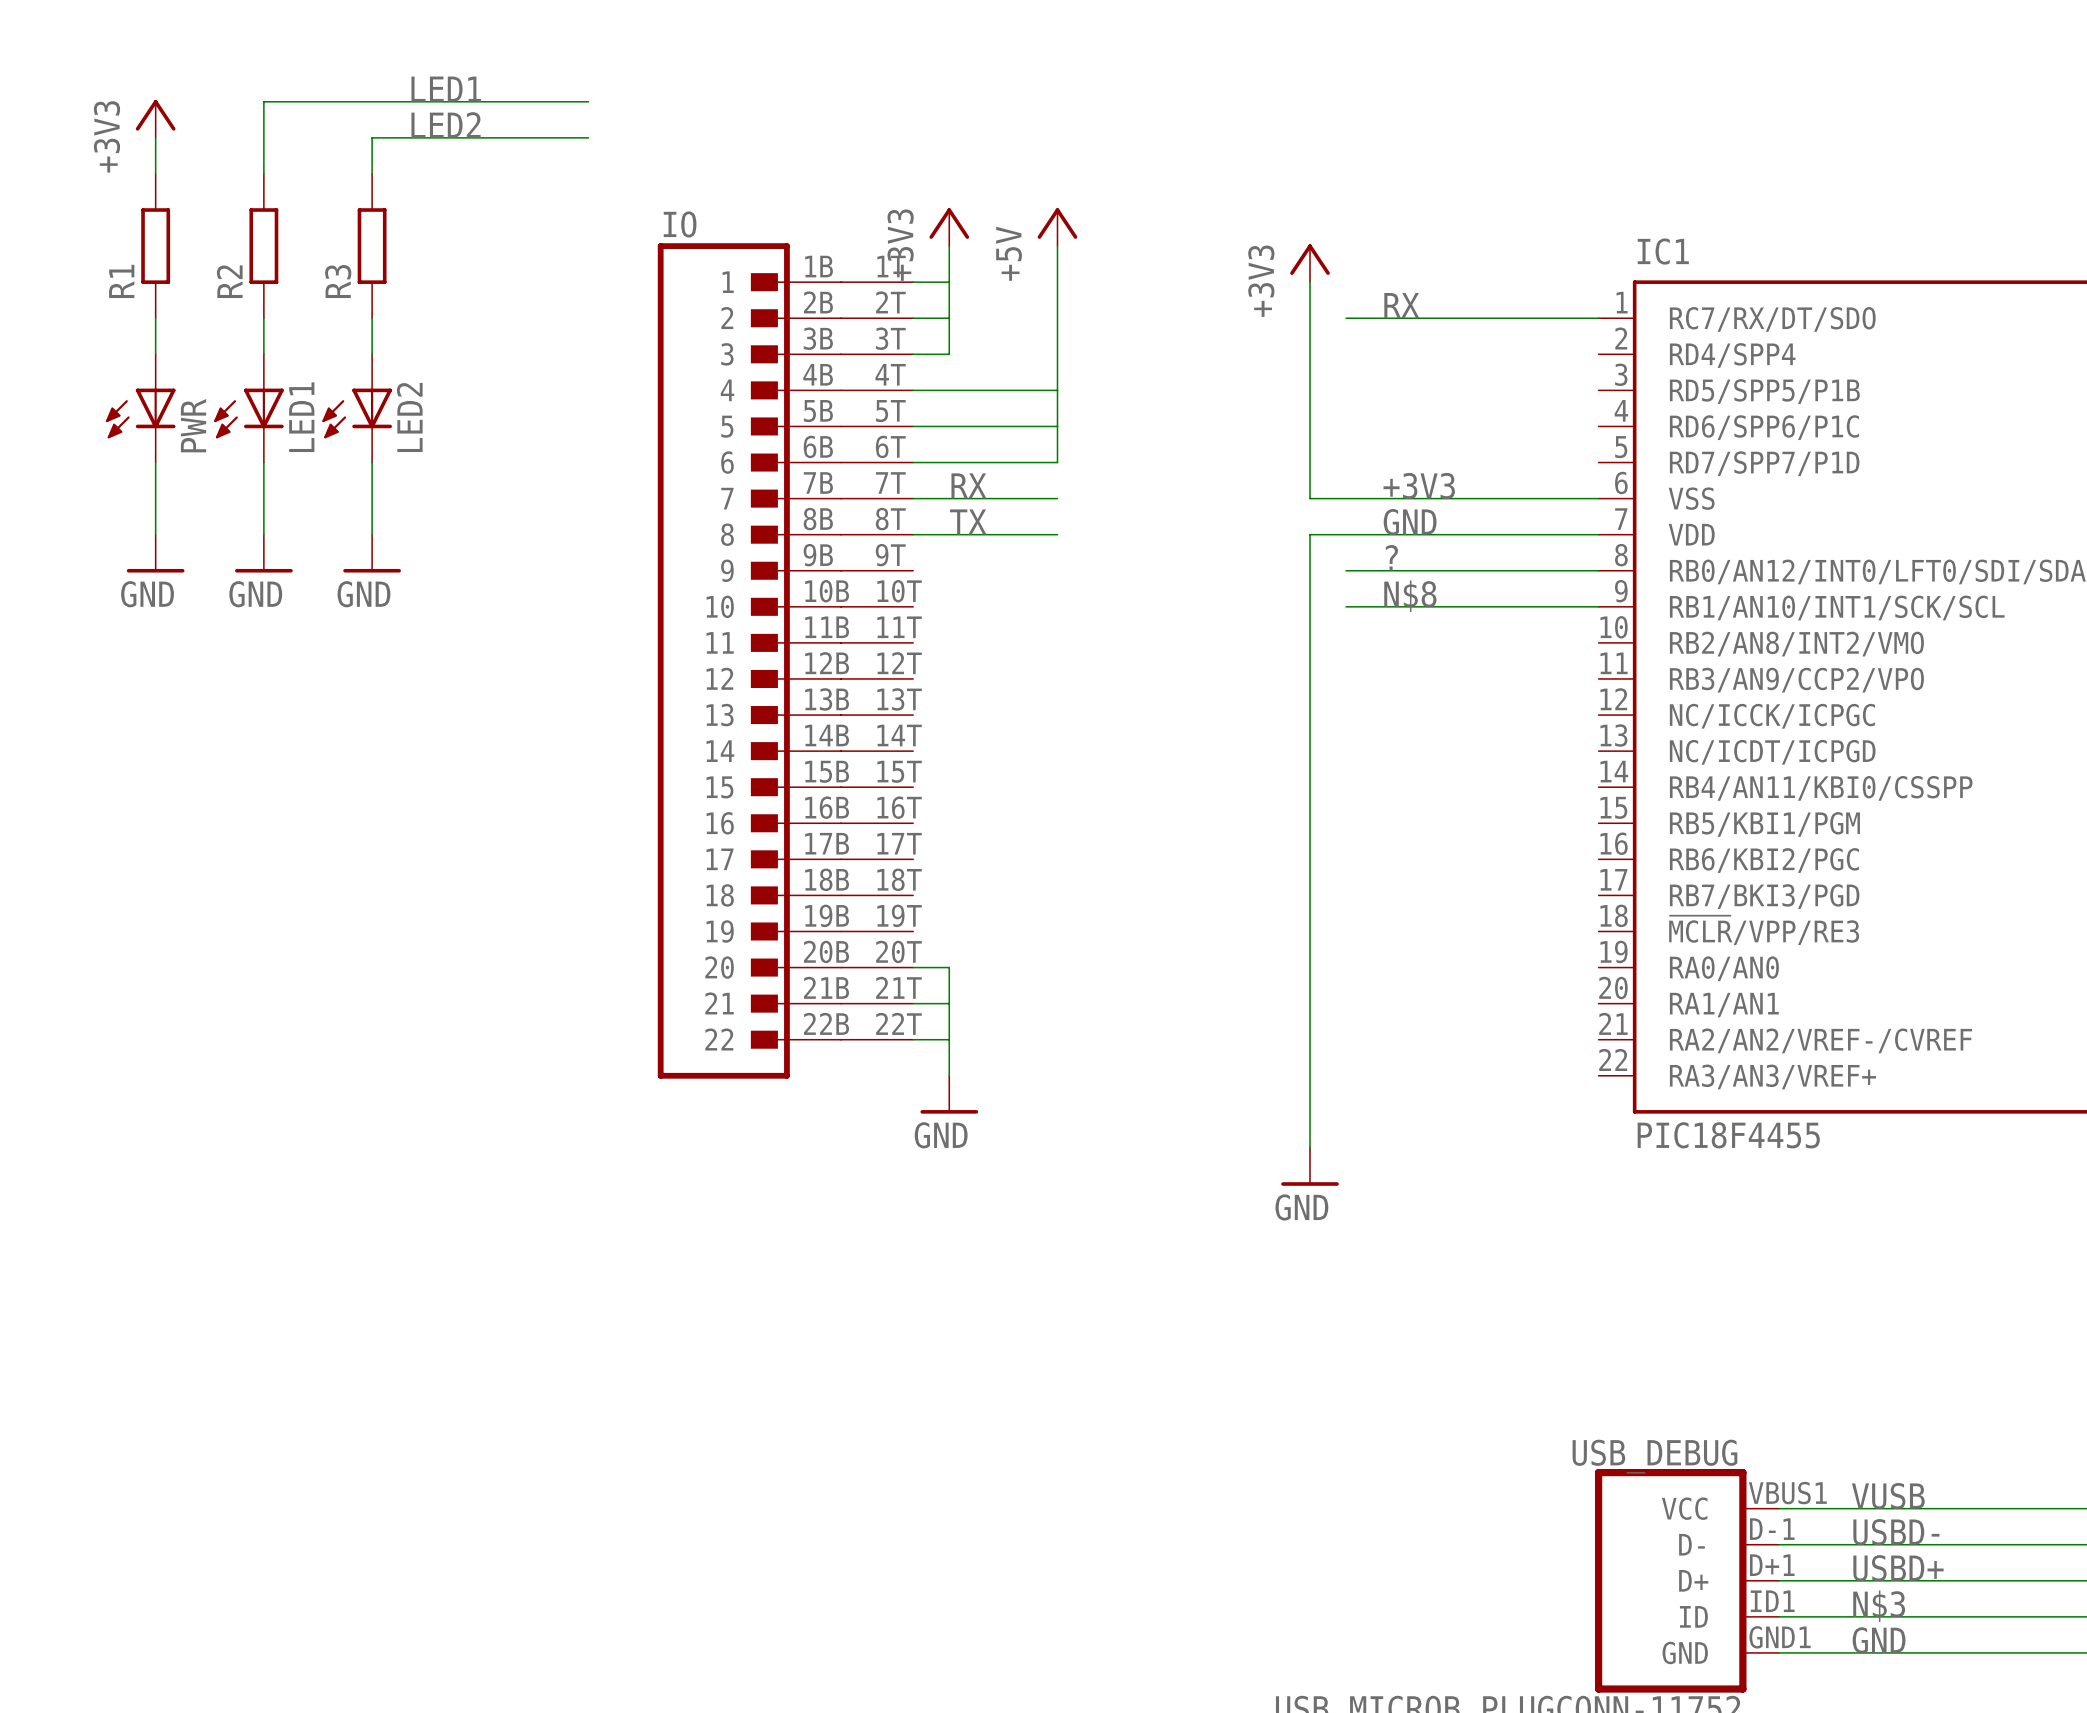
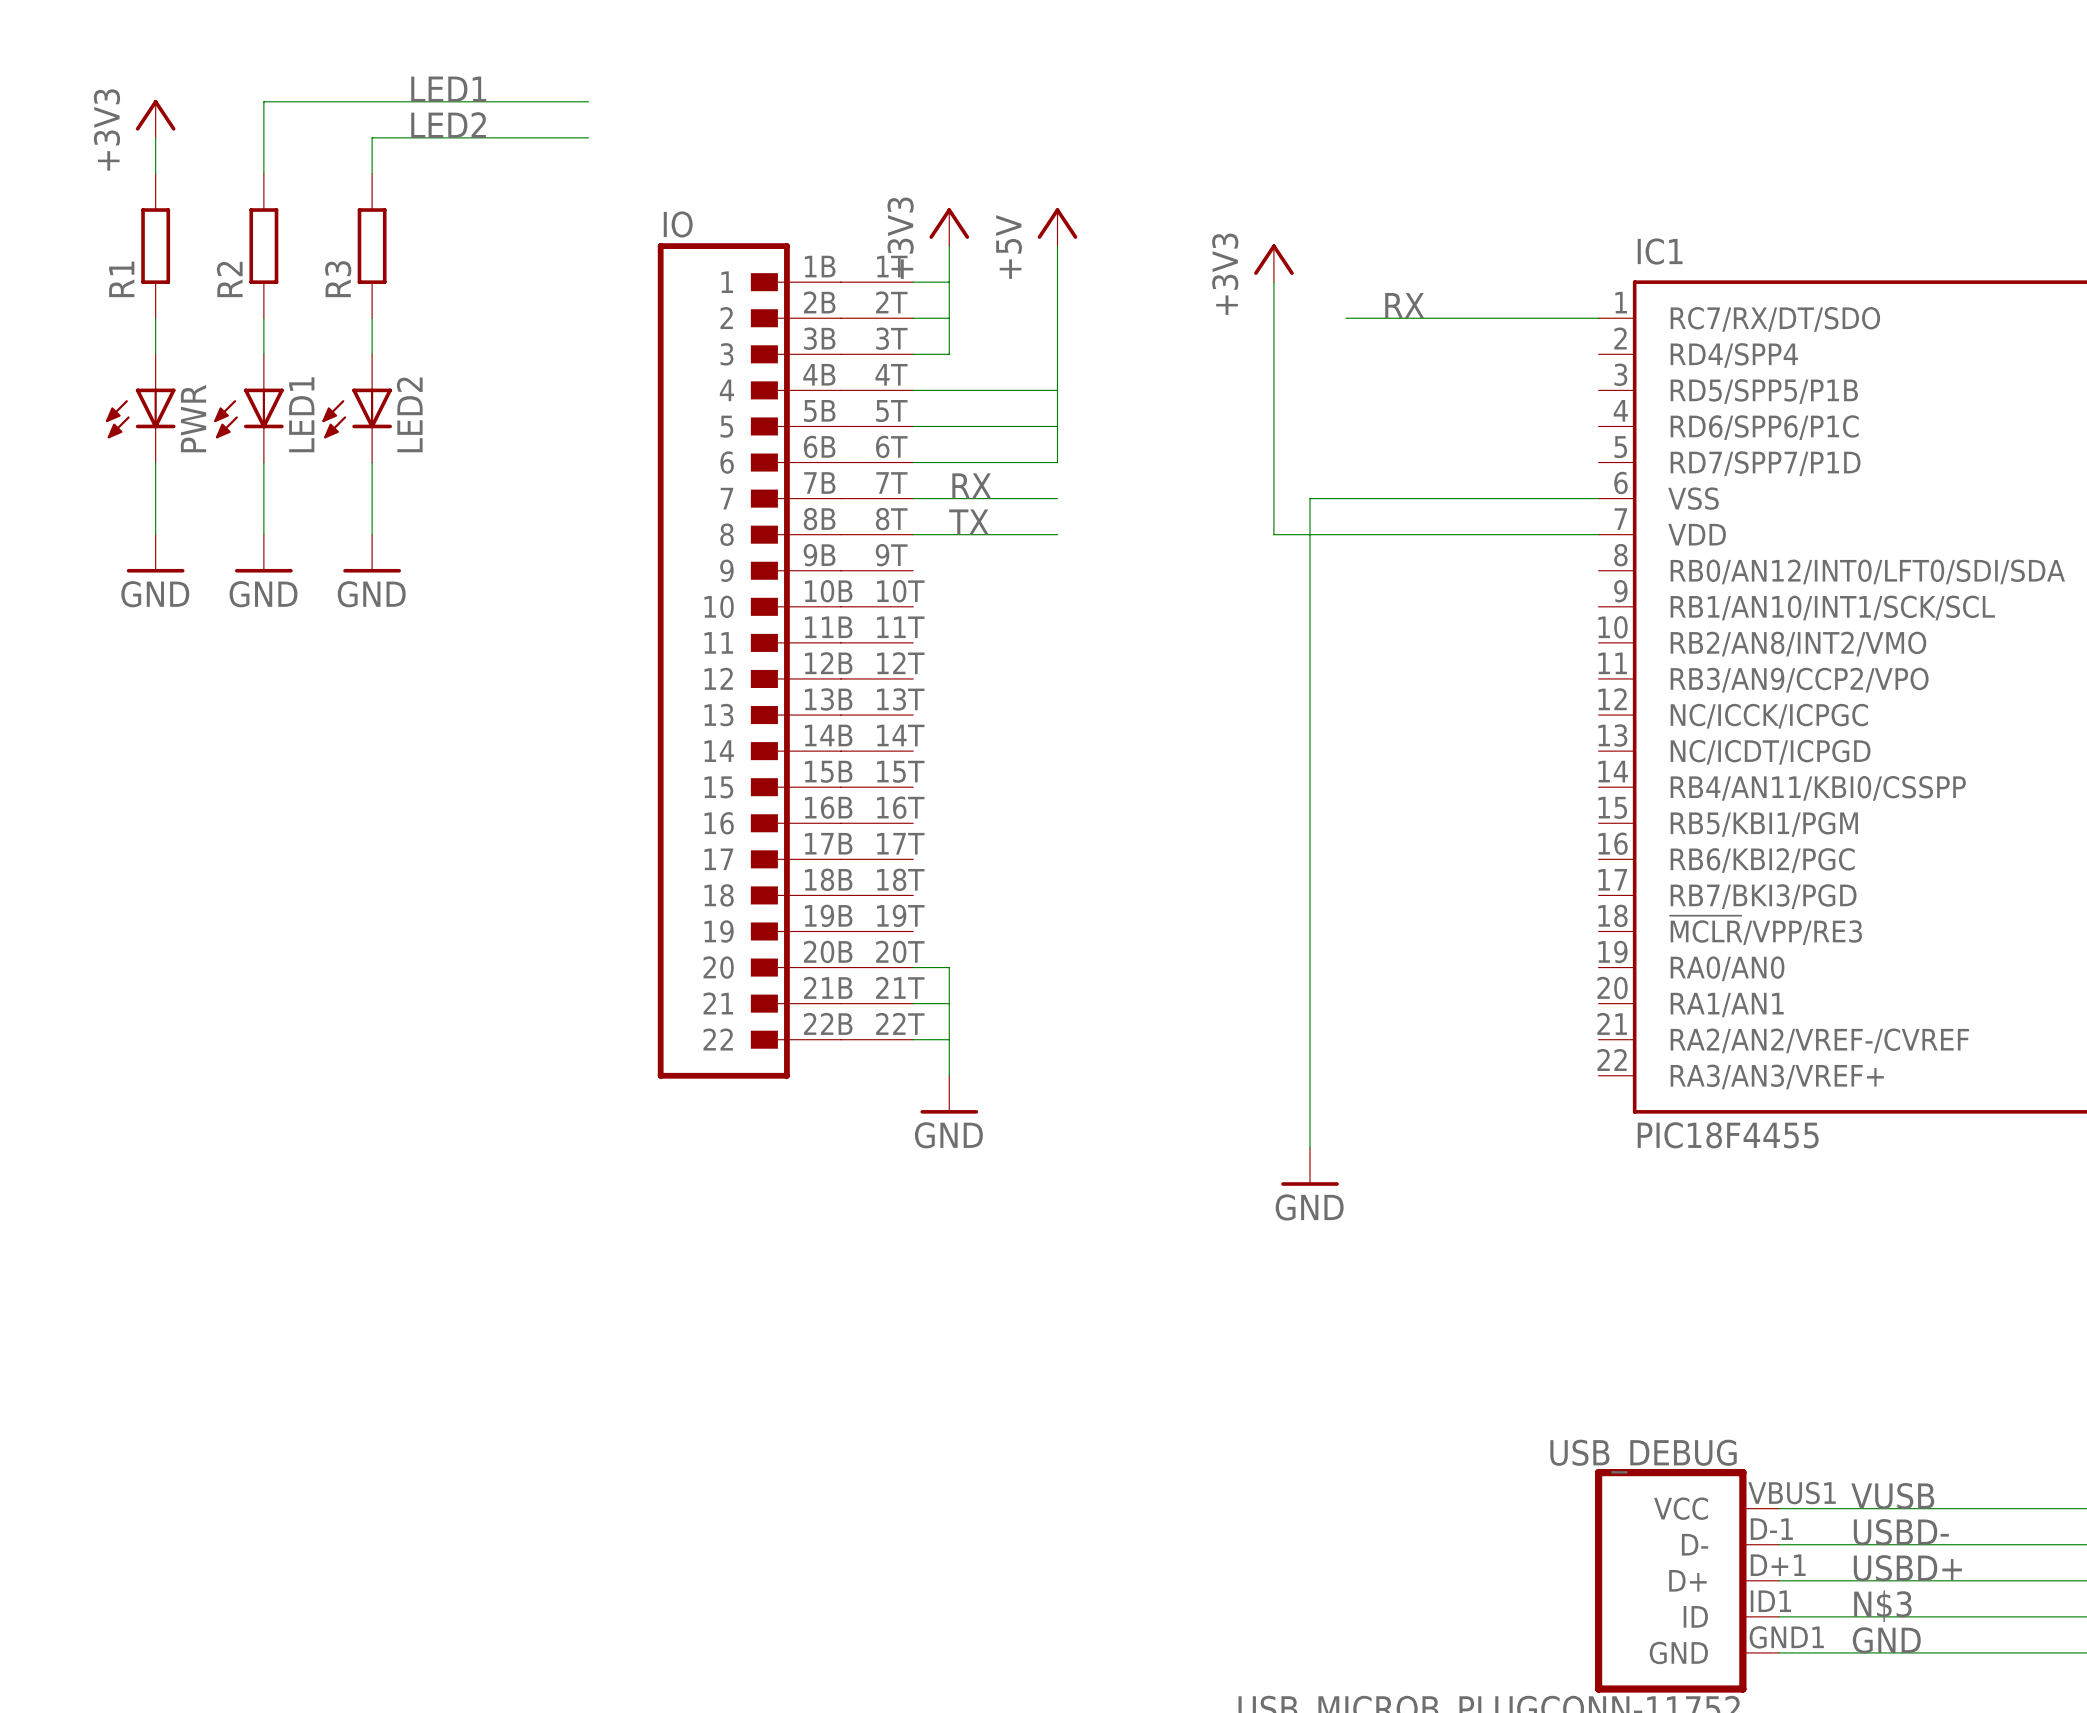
power symbol position: +3V3 (1310, 263) -> +3V3 (1273, 263)
wire: (1310, 282) (1310, 498) -> (1273, 282) (1273, 534) (1310, 534) (1310, 498)
label: +3V3 (1419, 486) -> none
label: GND (1410, 522) -> none
label: ? (1391, 557) -> none
wire: (1346, 570) (1598, 570) -> none
label: N$8 (1410, 596) -> none
wire: (1346, 606) (1598, 606) -> none

